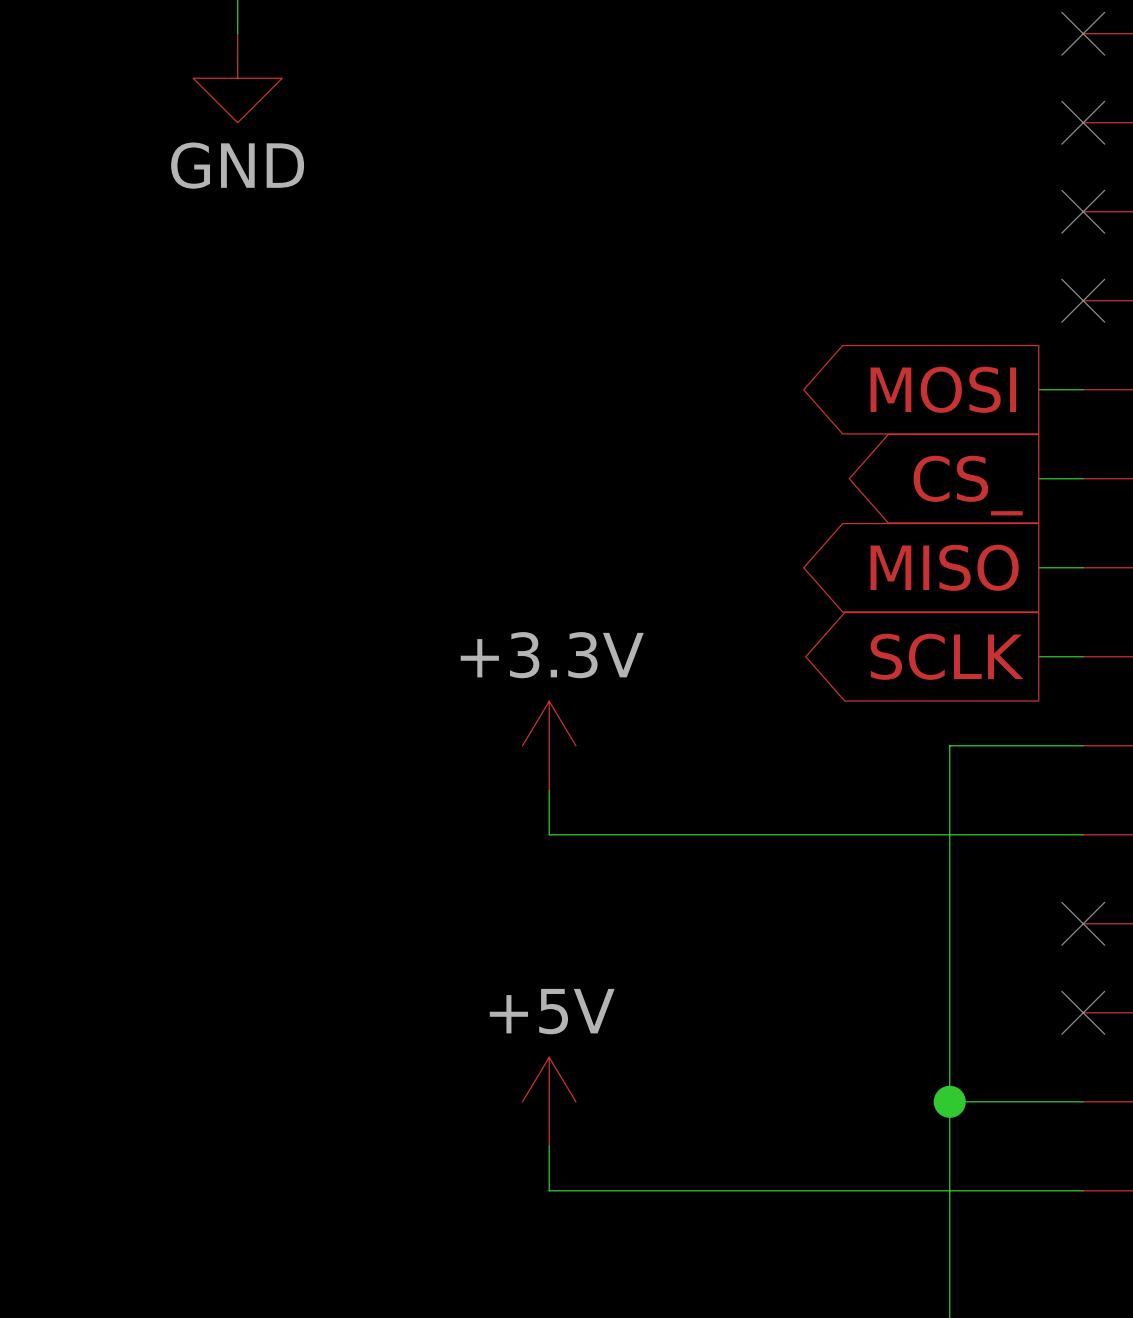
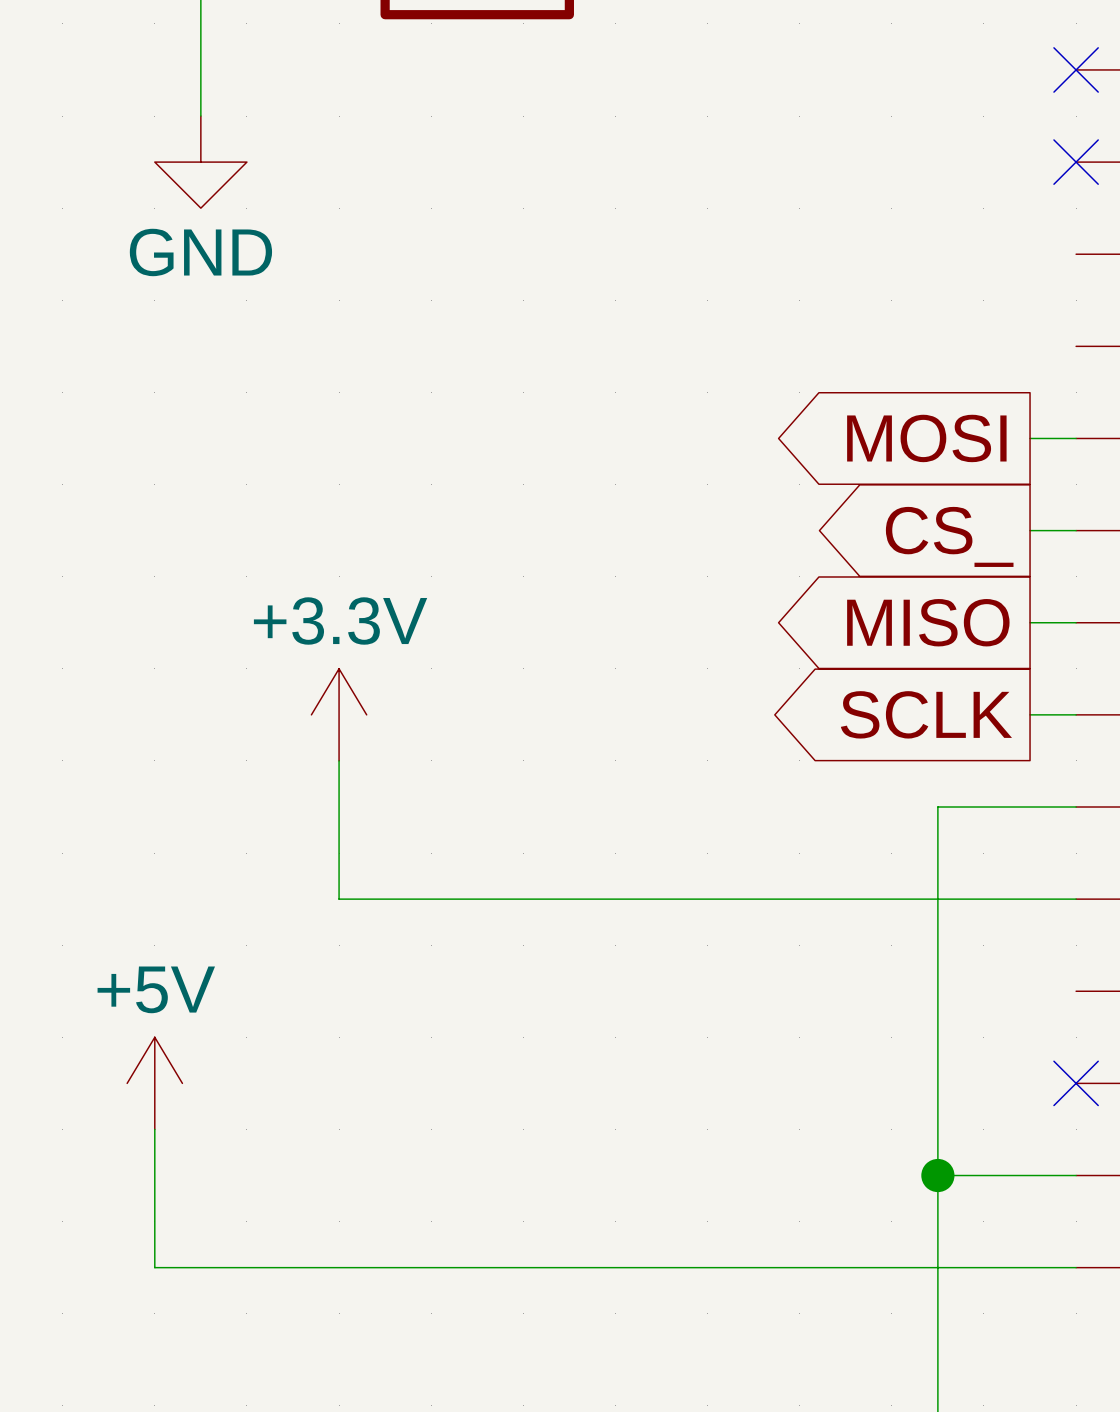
power symbol position: GND (237, 78) -> GND (200, 162)
no-connect mark: (1083, 211) -> none
no-connect mark: (1083, 300) -> none
power symbol position: +3.3V (549, 745) -> +3.3V (339, 714)
wire: (549, 790) (549, 834) -> (339, 760) (339, 899) (523, 899)
no-connect mark: (1083, 923) -> none
power symbol position: +5V (549, 1101) -> +5V (154, 1083)
wire: (549, 1146) (549, 1190) -> (154, 1129) (154, 1267) (523, 1267)

